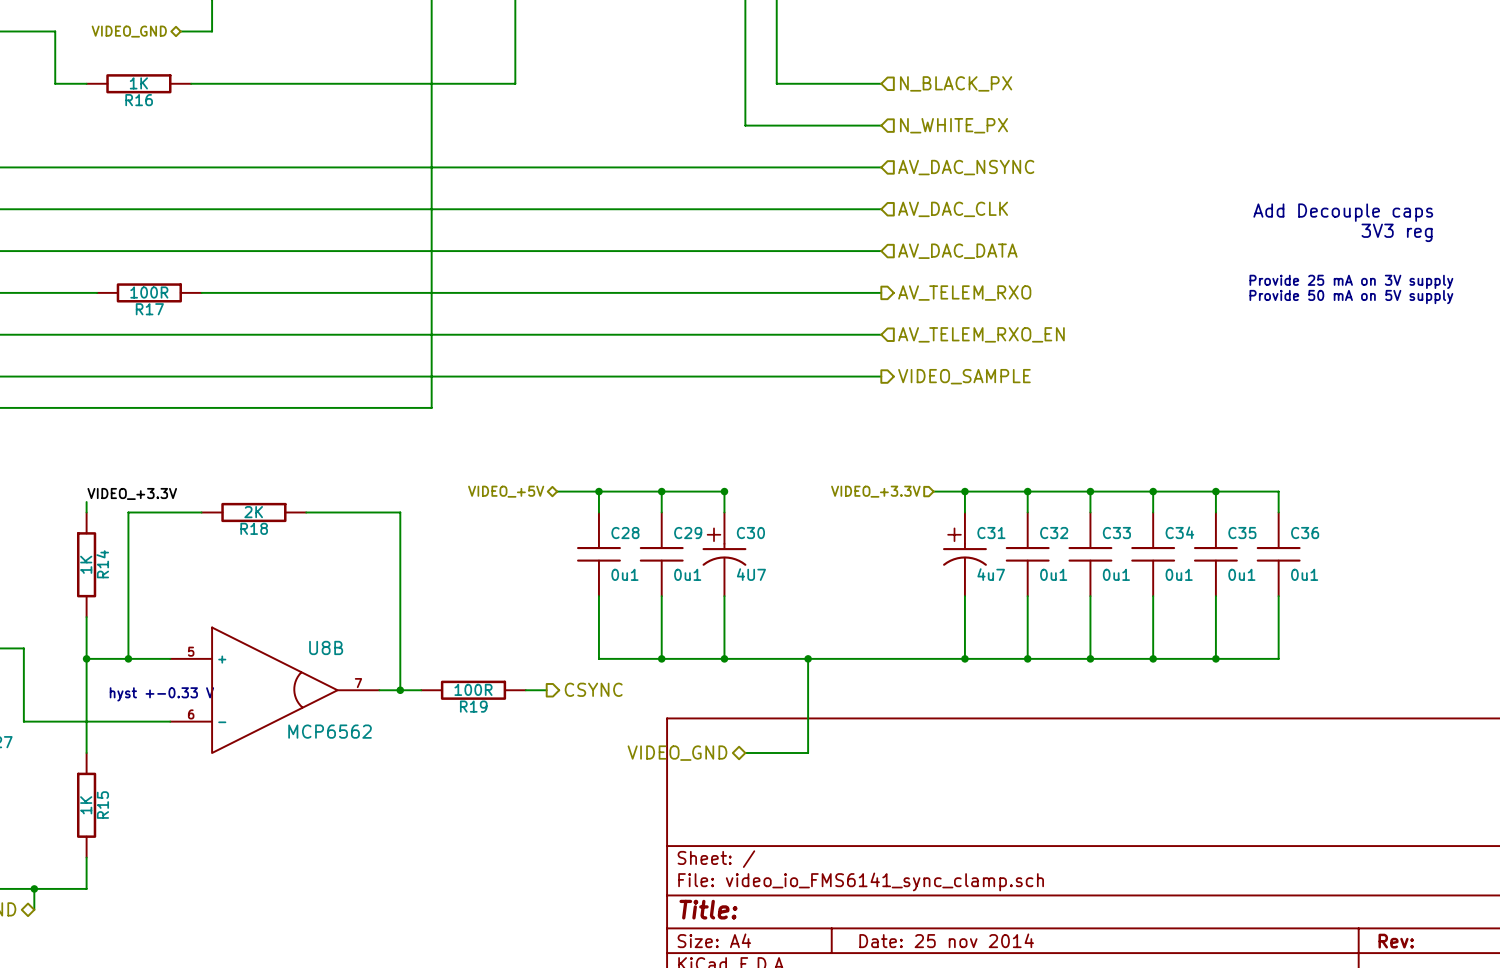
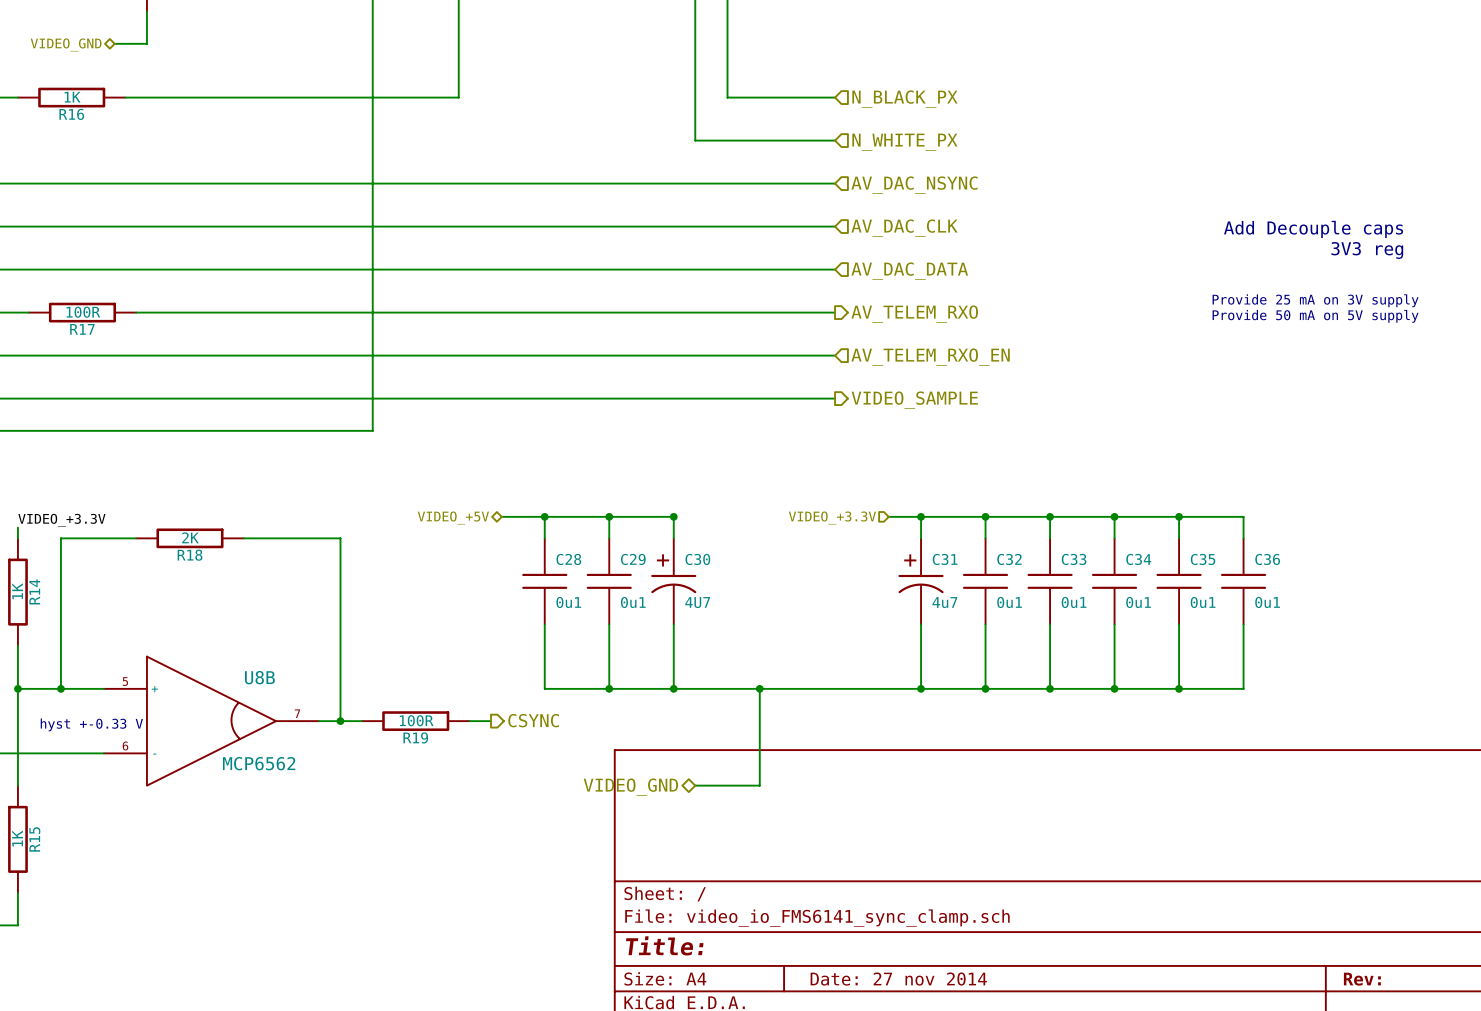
title block: Date: 25 nov 2014 (946, 940) -> Date: 27 nov 2014 (898, 979)

